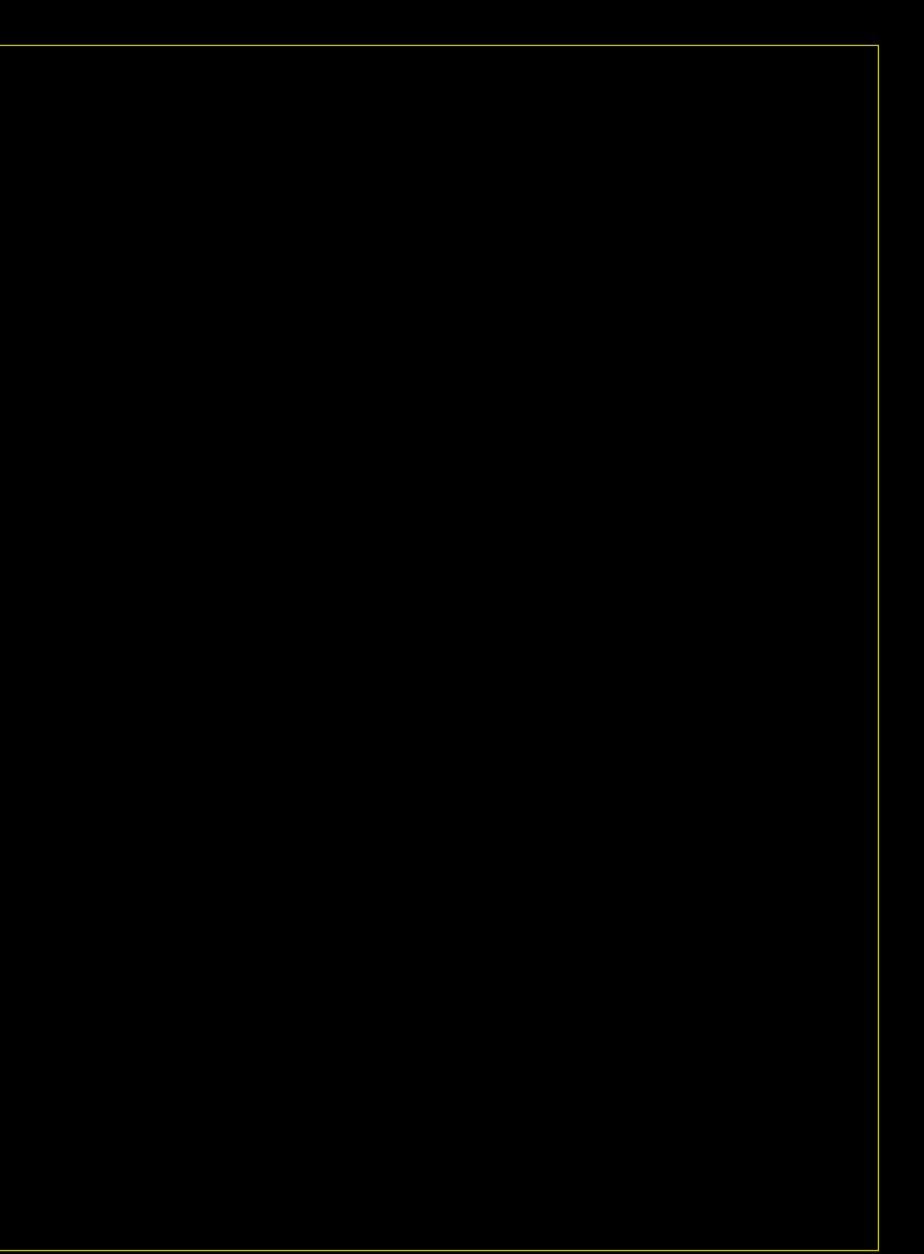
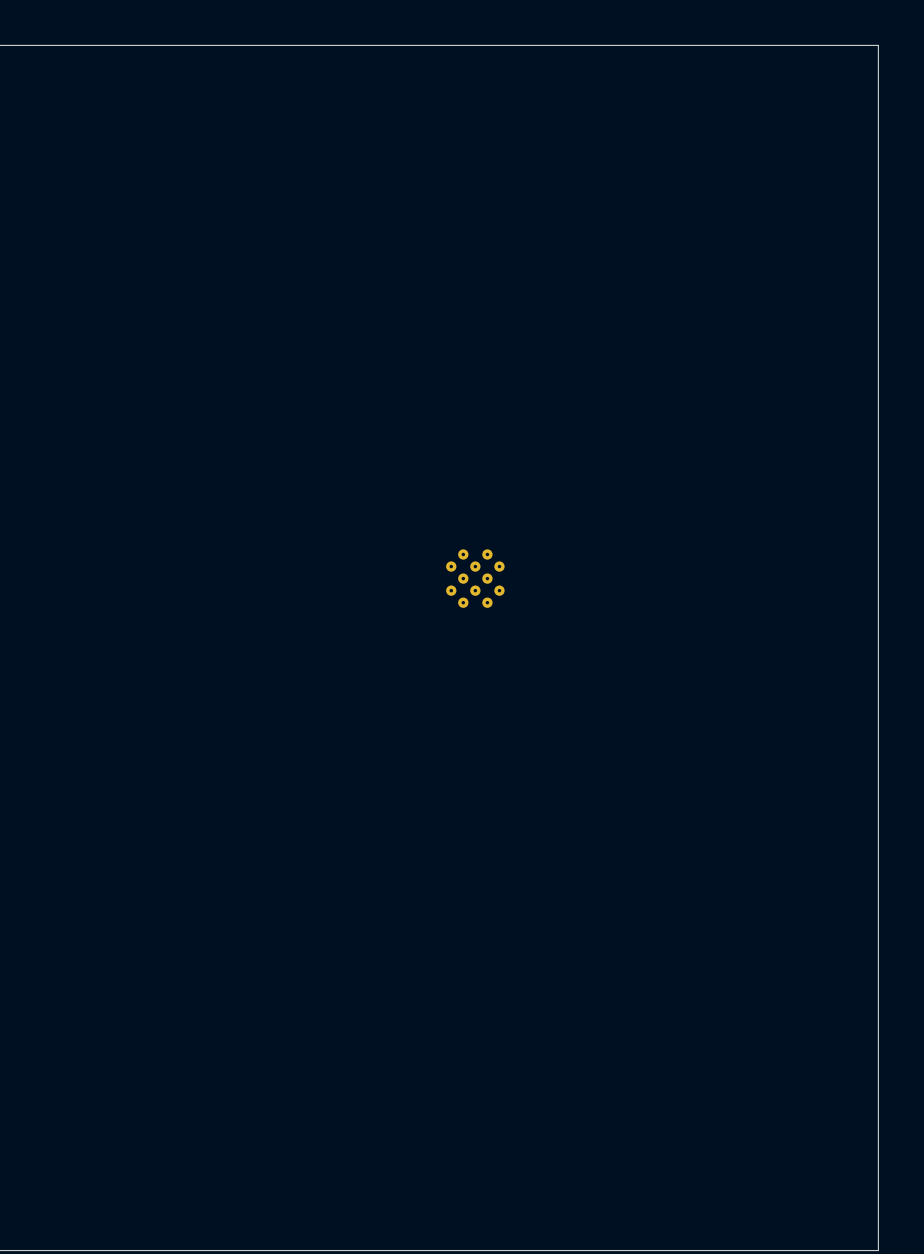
part: none -> (475, 578)

